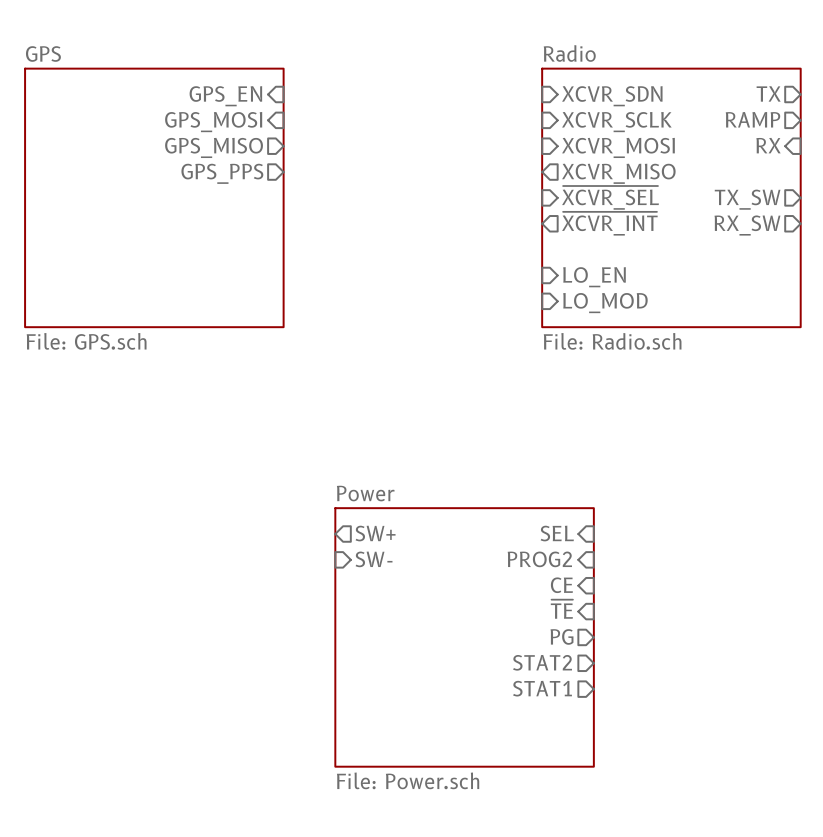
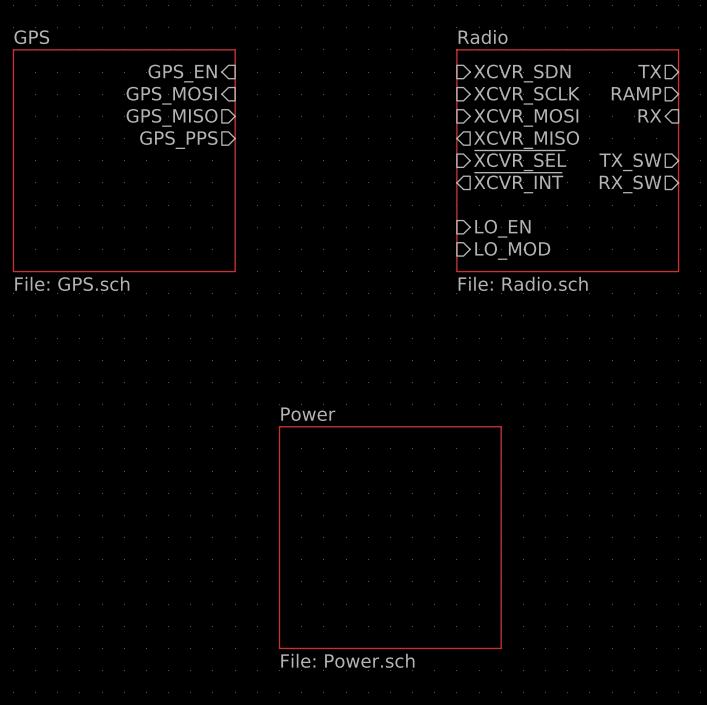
sheet pin: SW+ (375, 533) -> none
sheet pin: SEL (557, 533) -> none
sheet pin: SW- (374, 559) -> none
sheet pin: PROG2 (539, 559) -> none
sheet pin: CE (561, 585) -> none
sheet pin: ~{TE} (561, 609) -> none
sheet pin: PG (562, 636) -> none
sheet pin: STAT2 (542, 662) -> none
sheet pin: STAT1 (542, 688) -> none

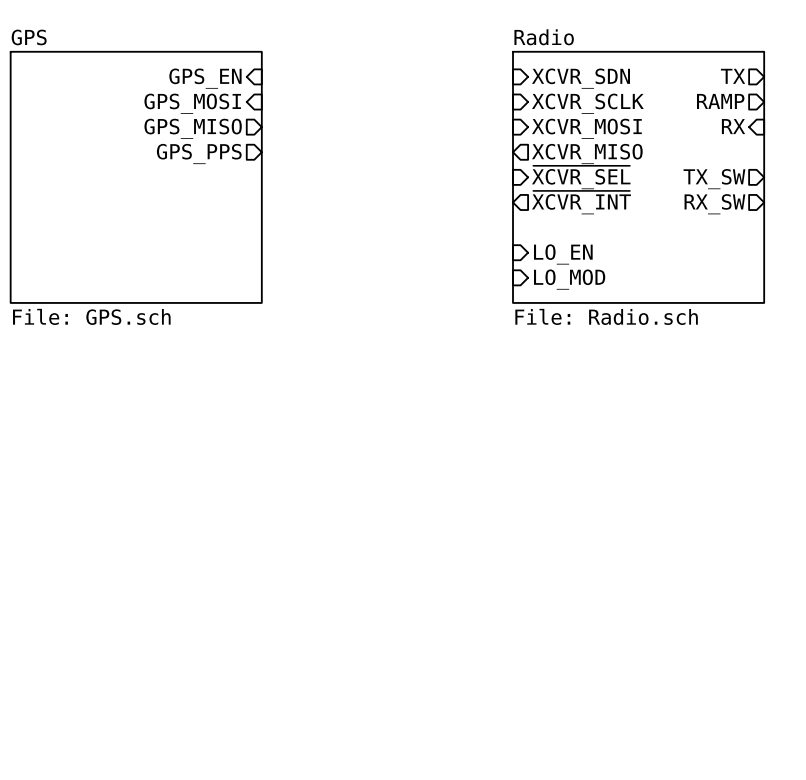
sheet Power: File: Power.sch (390, 537) -> none

